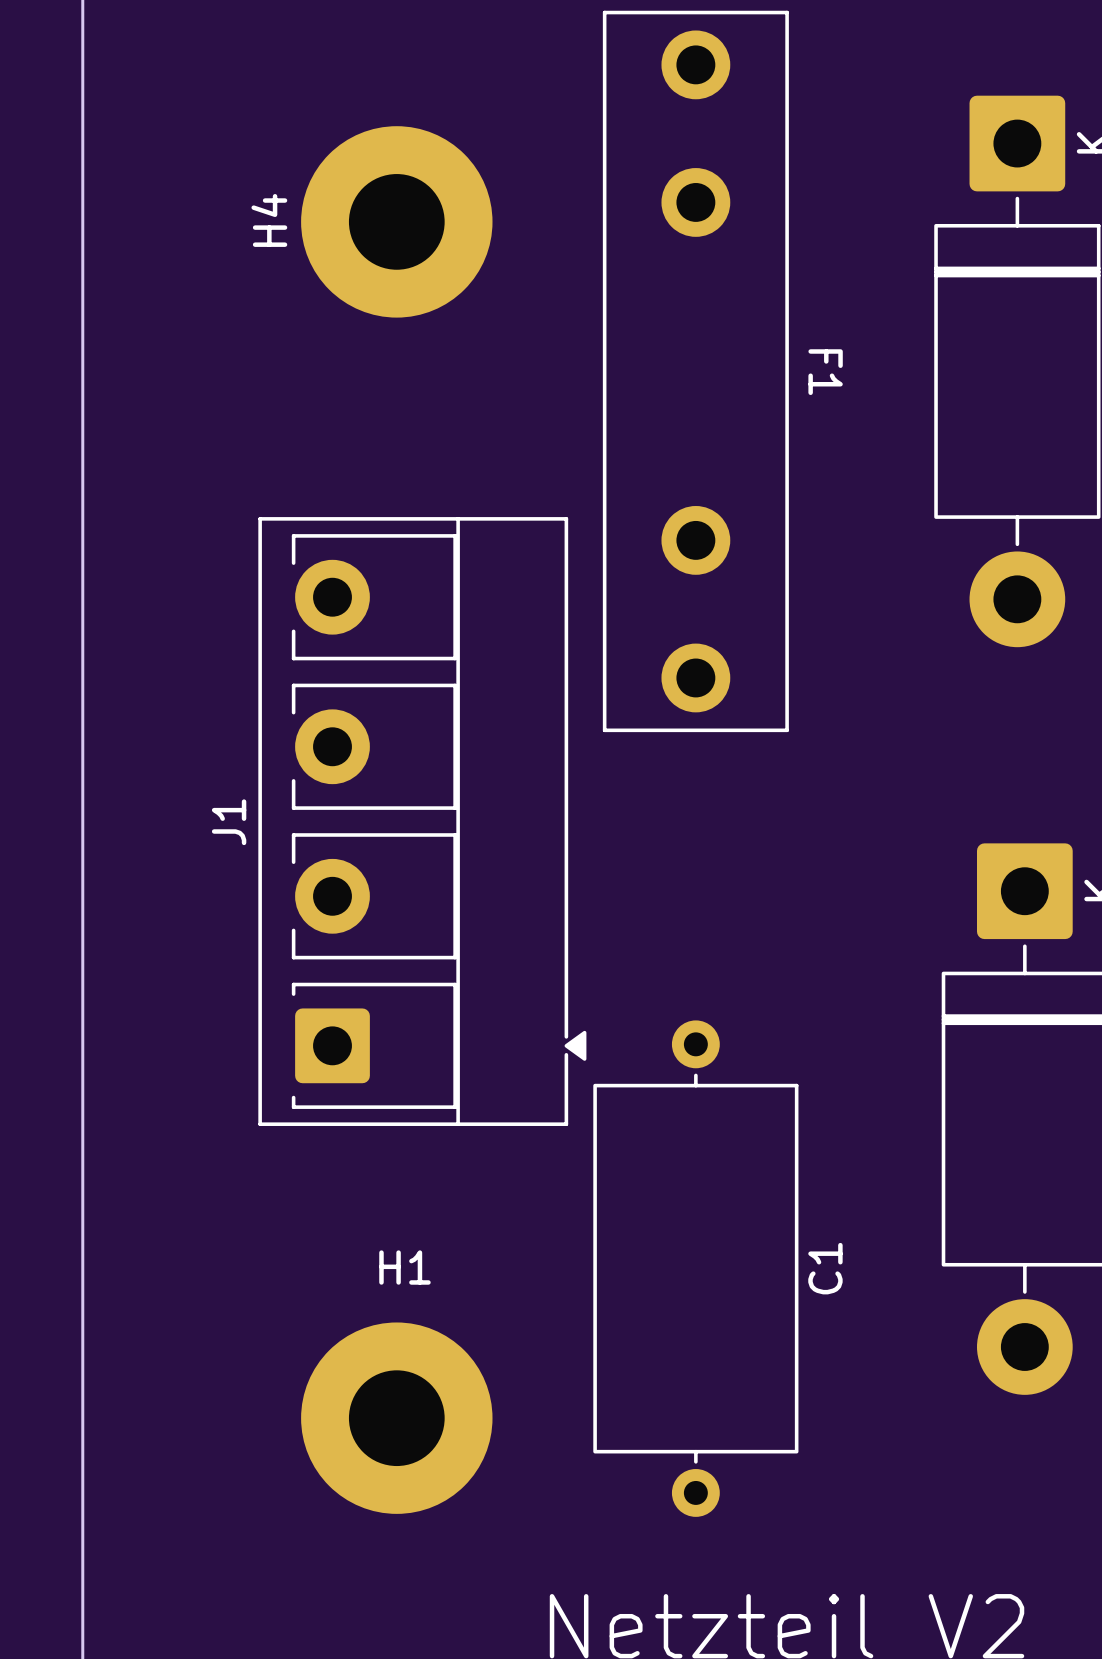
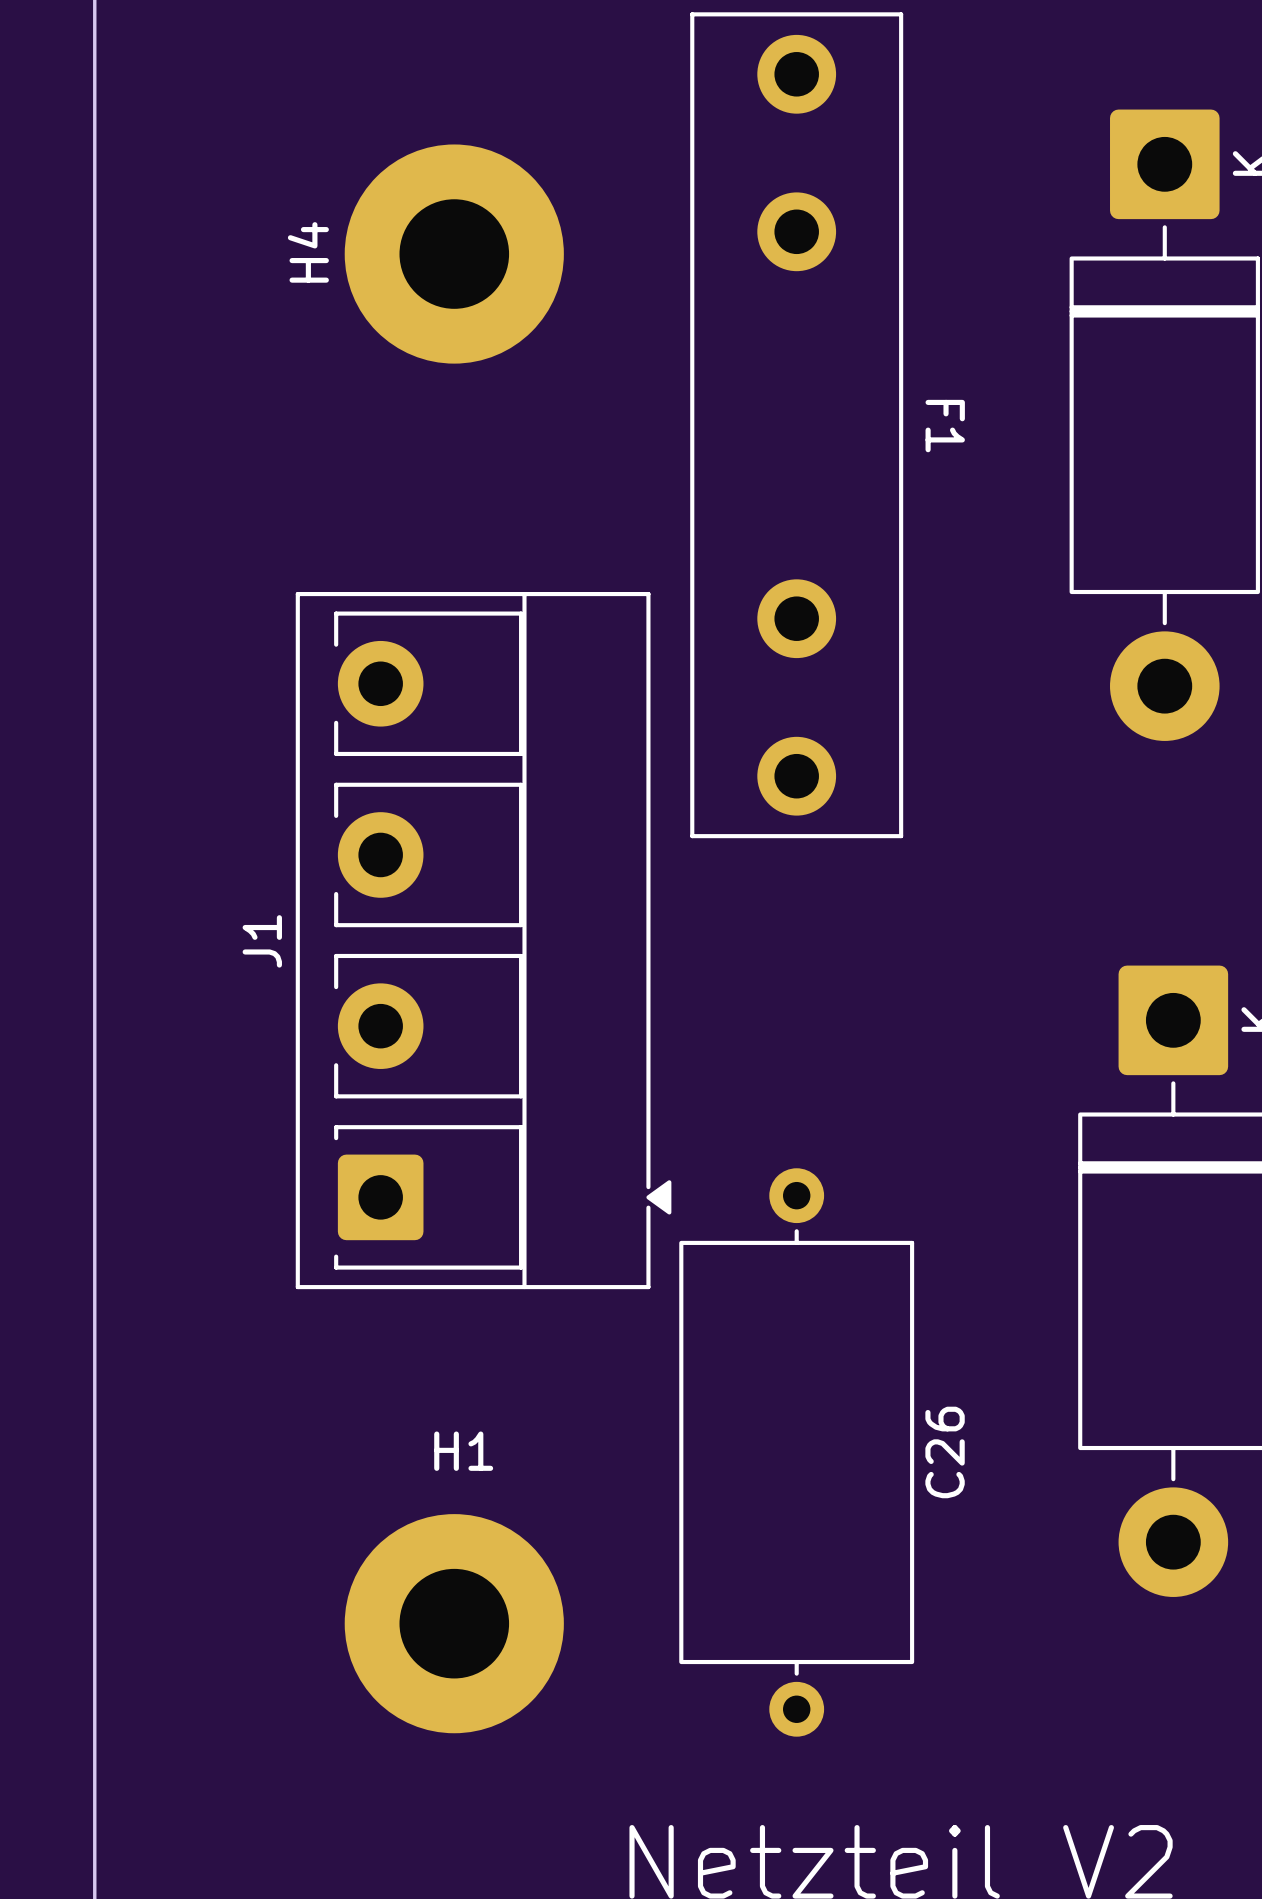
C1 name: C1 (825, 1268) -> C26 (945, 1452)

